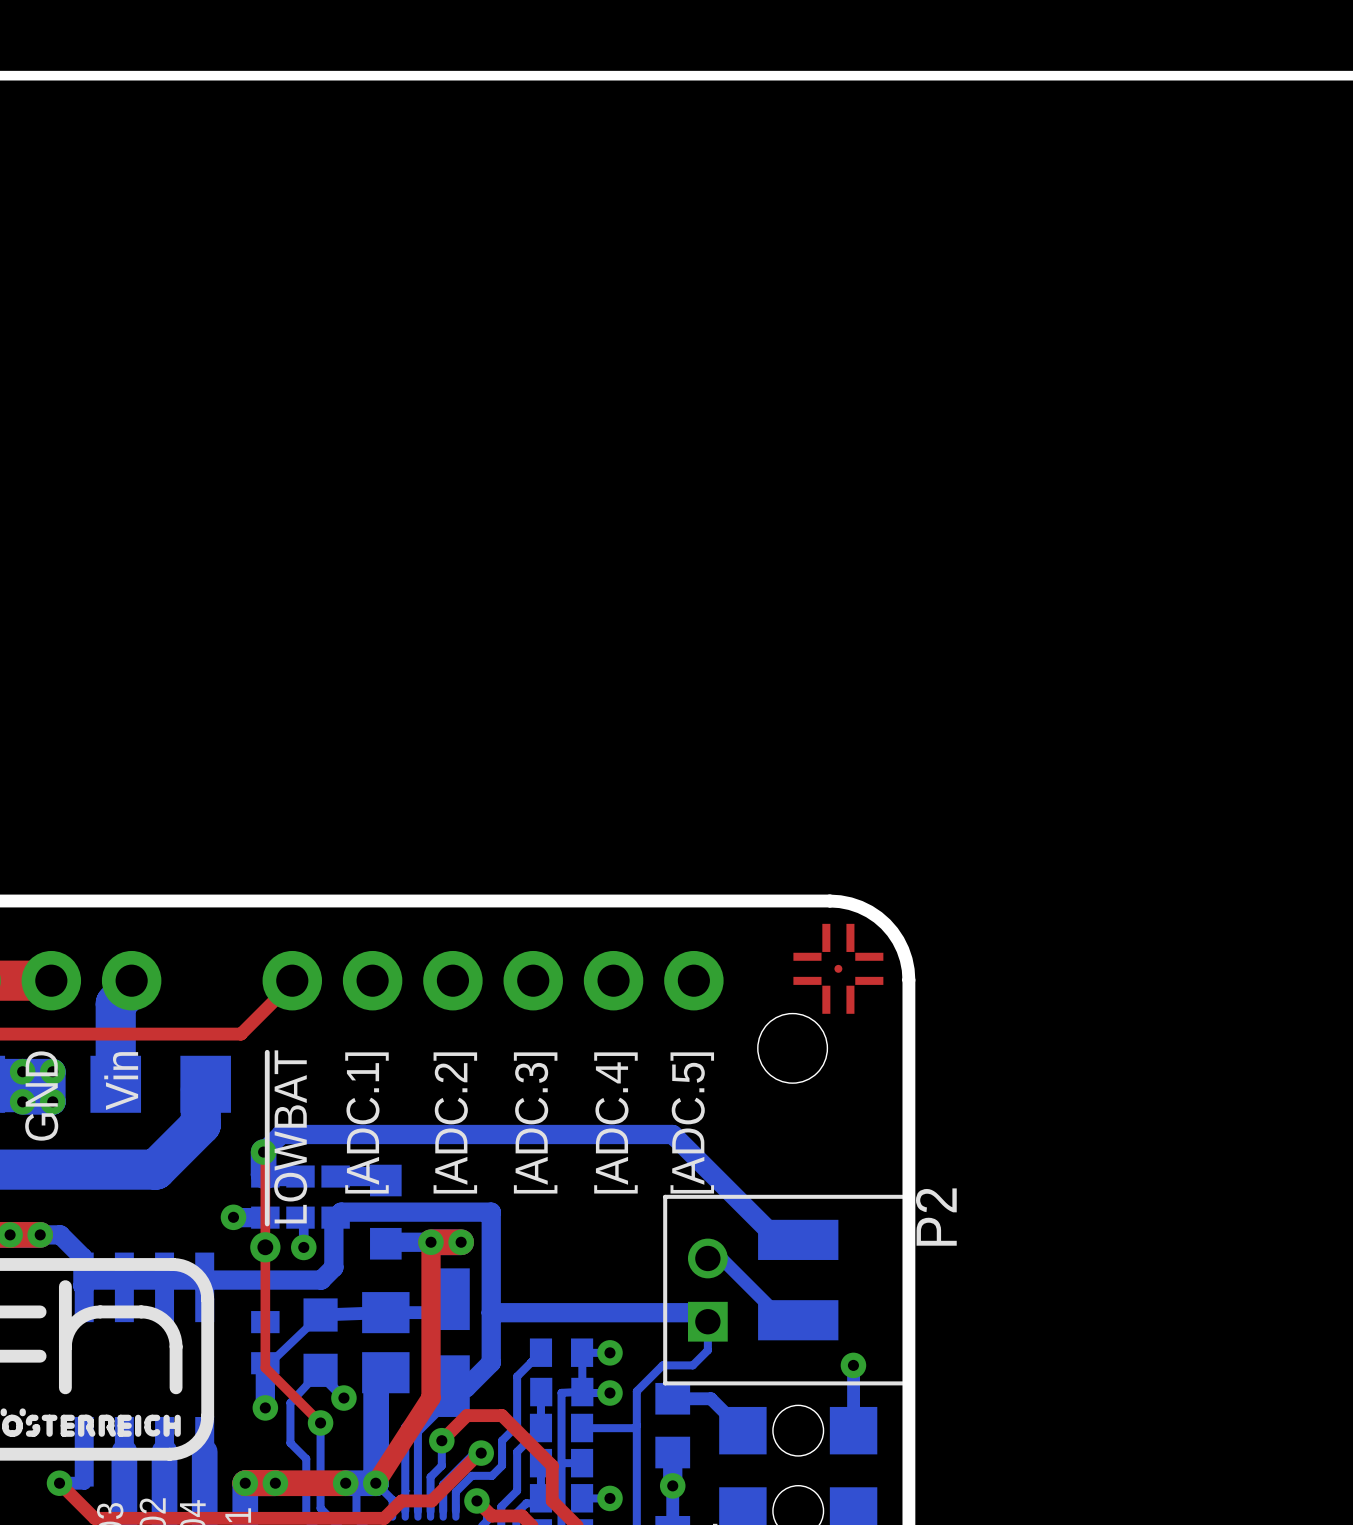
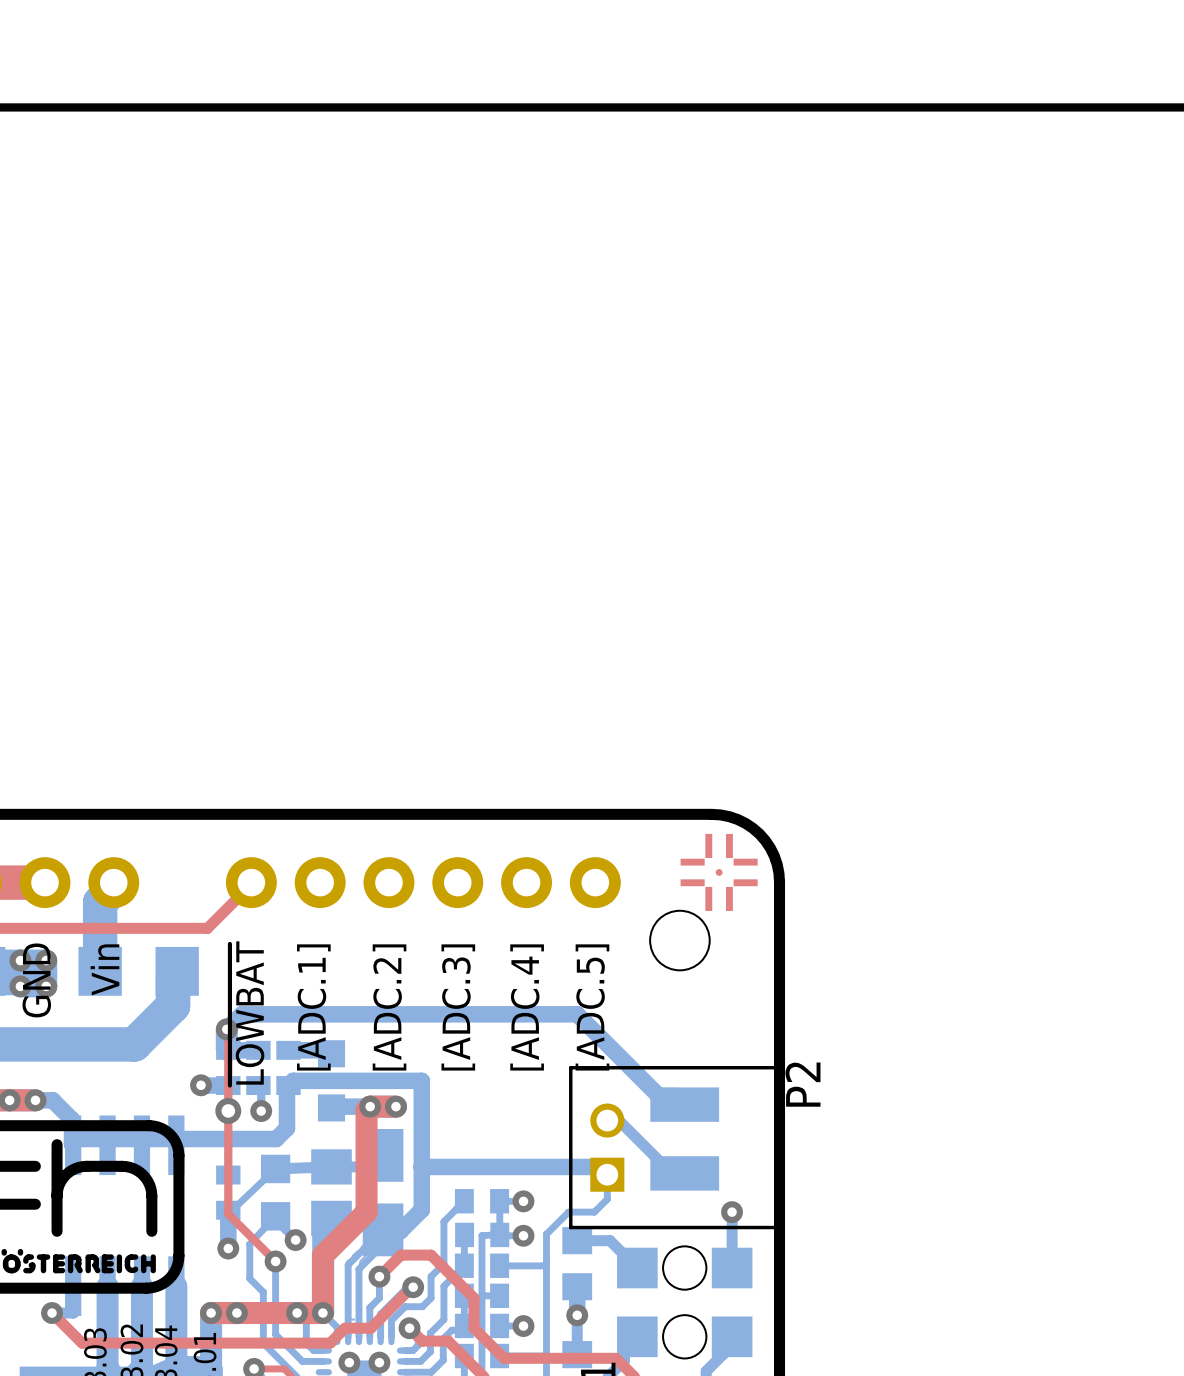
top track: (431, 1242) (431, 1397) (375, 1483) -> (370, 1106) (366, 1110) (366, 1212) (322, 1255) (322, 1313) (297, 1313)

